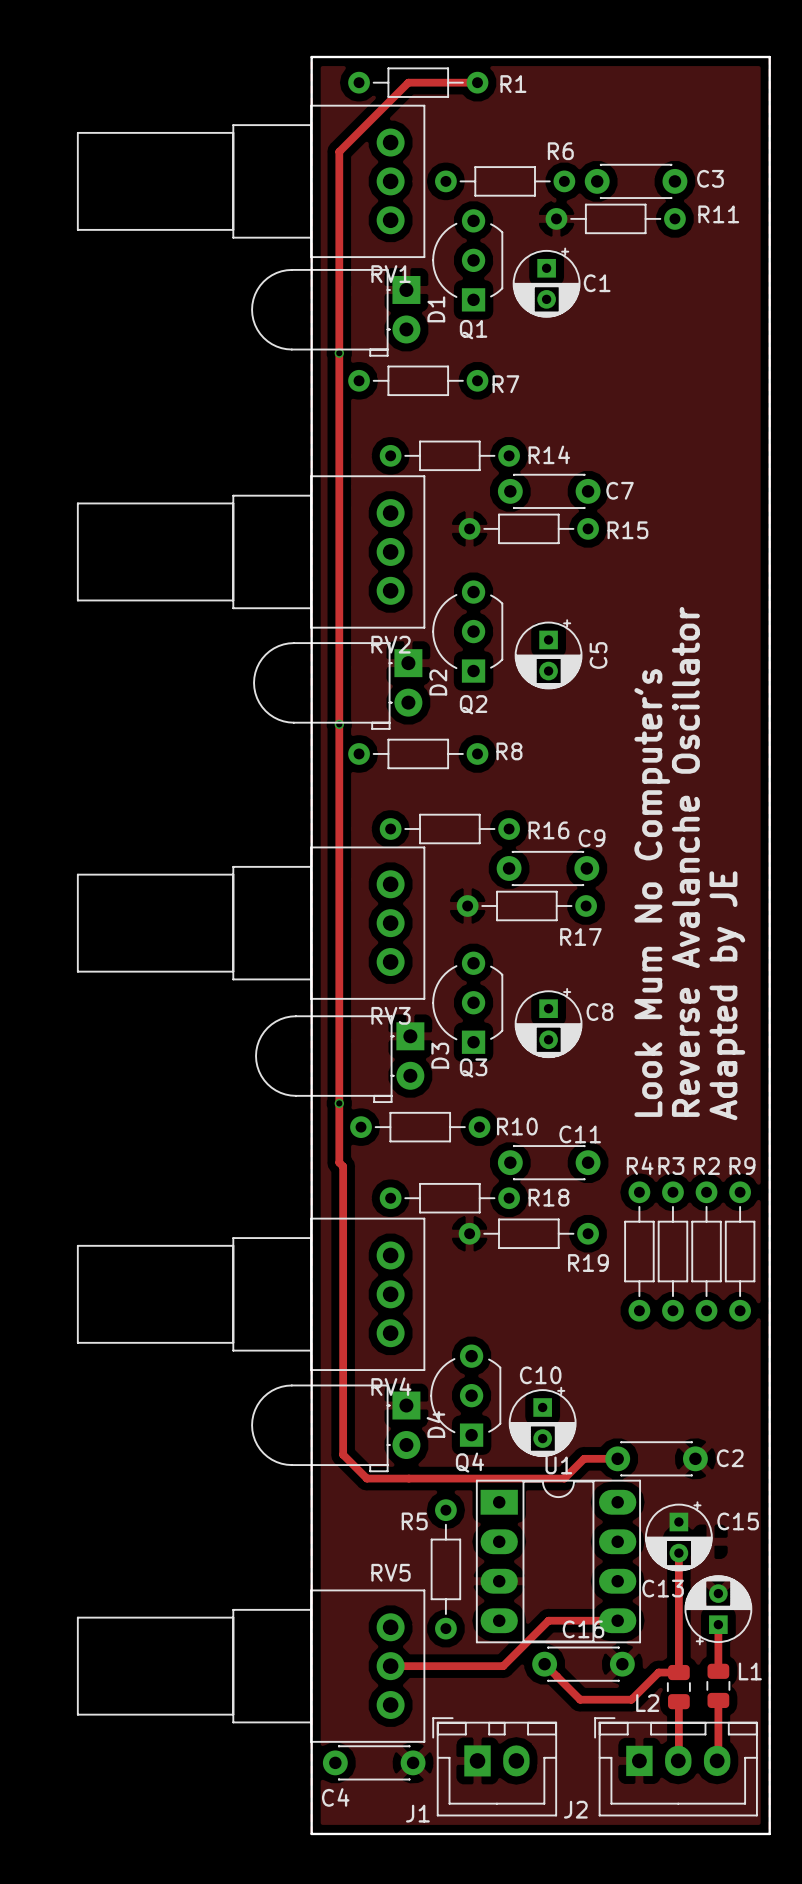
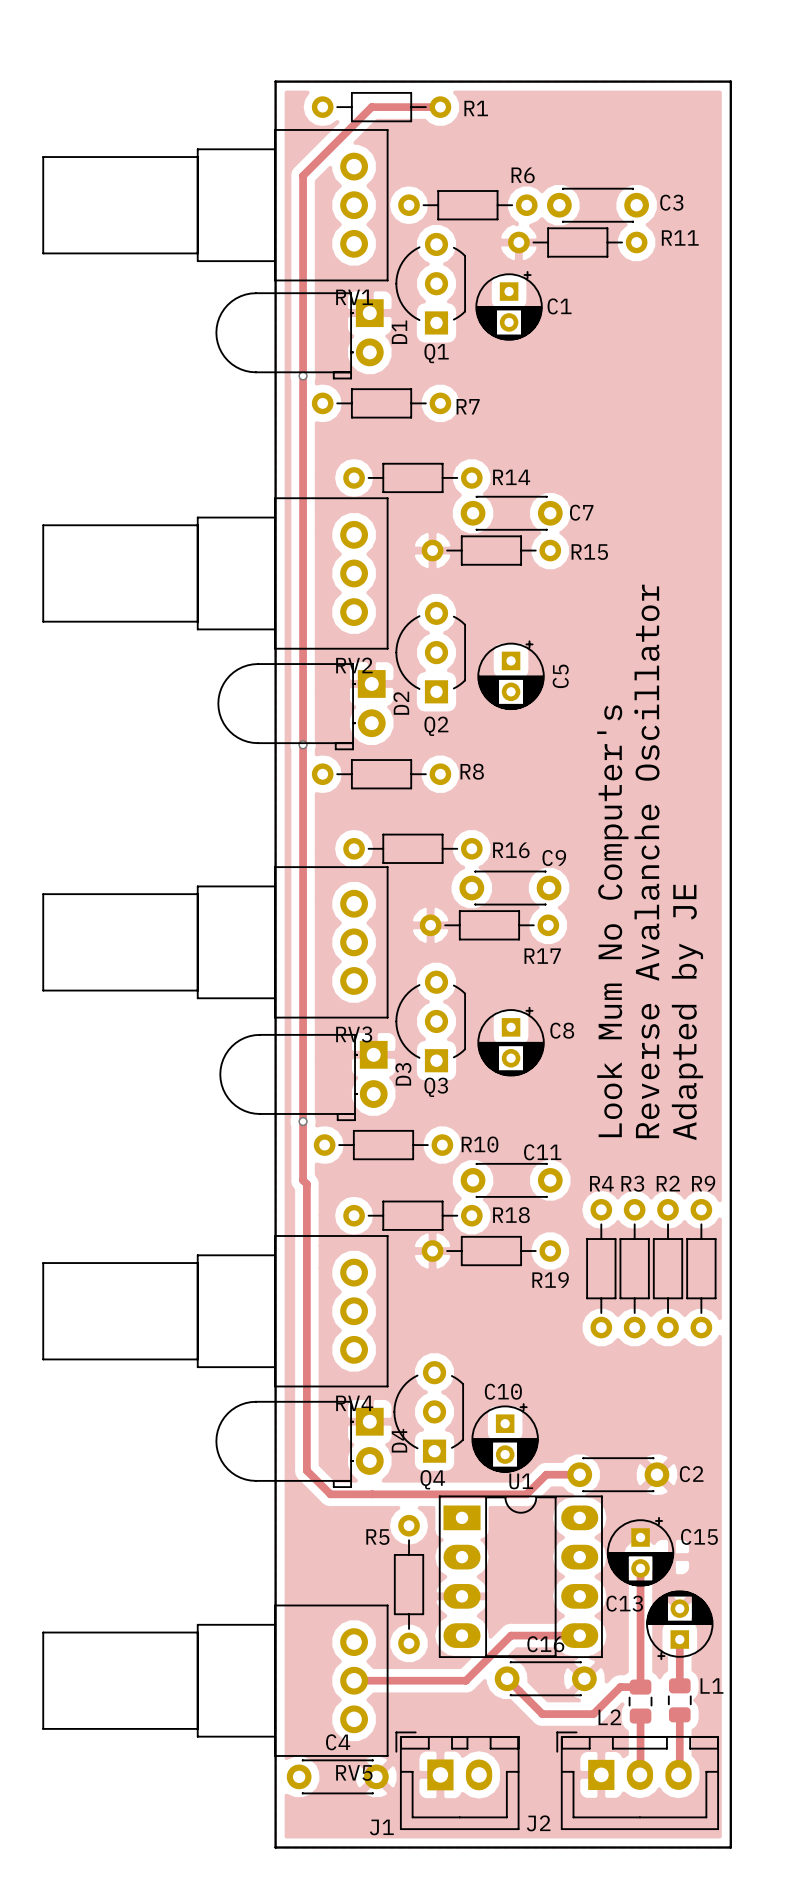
RV5 name position: RV5 (391, 1572) -> RV5 (354, 1772)
C4 name position: C4 (335, 1797) -> C4 (338, 1742)

